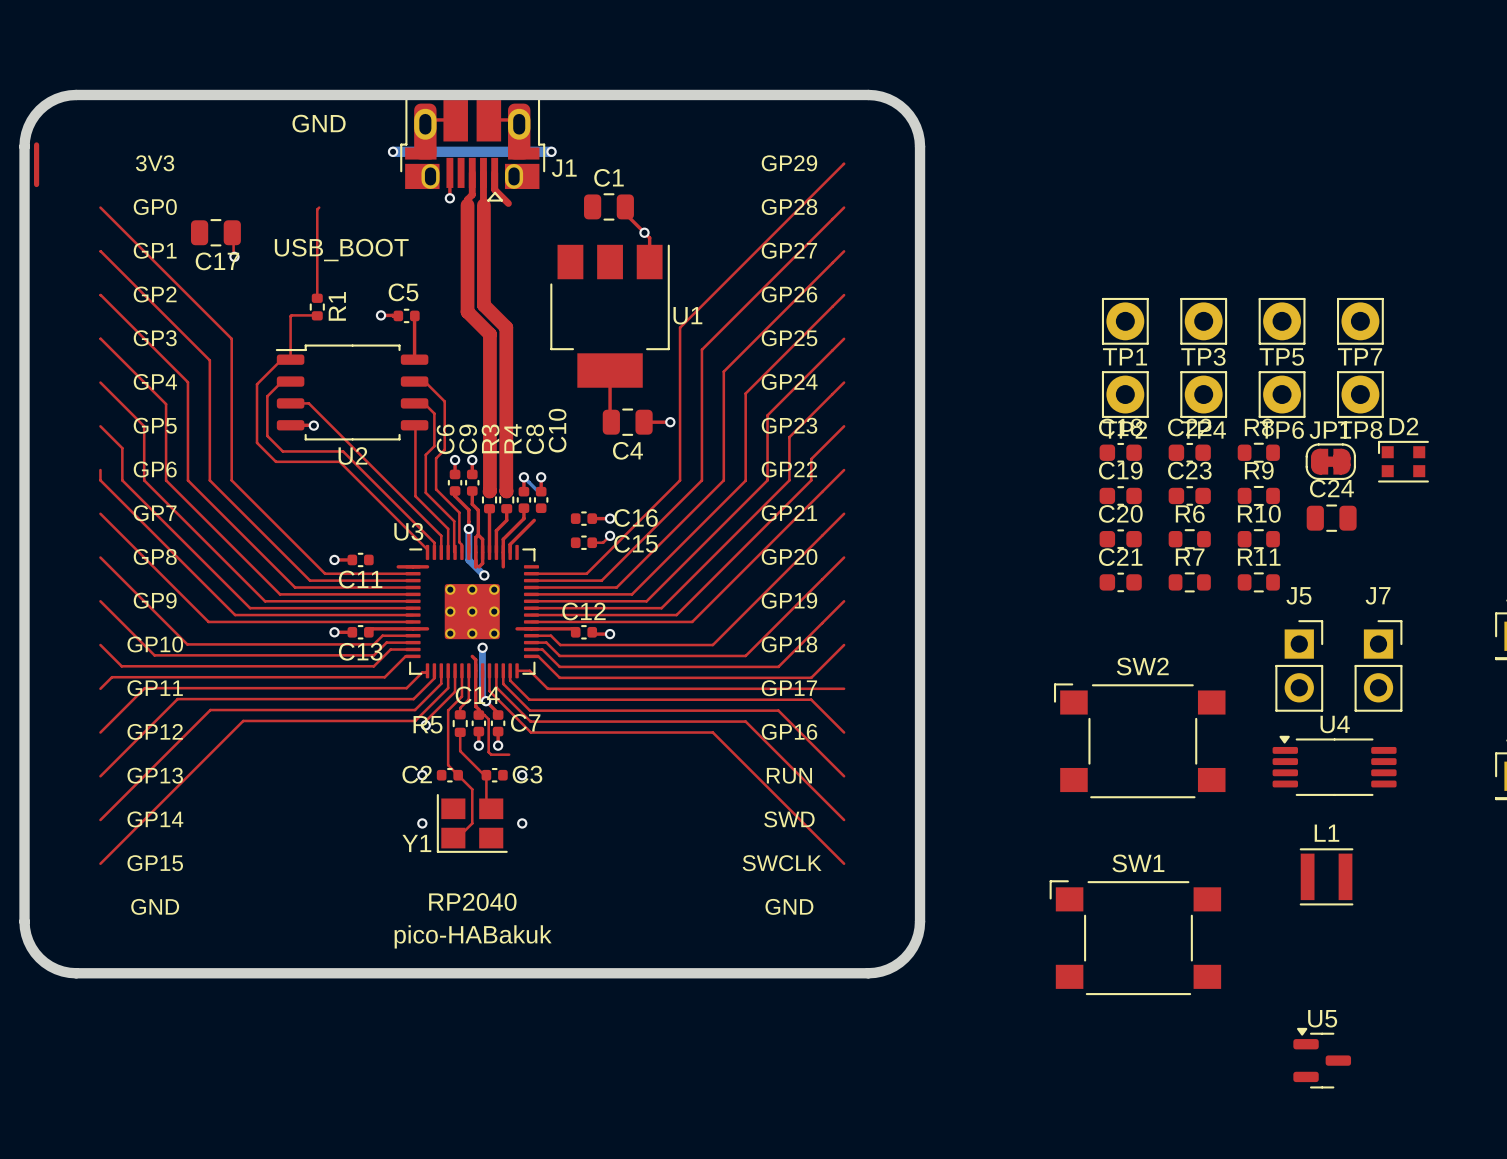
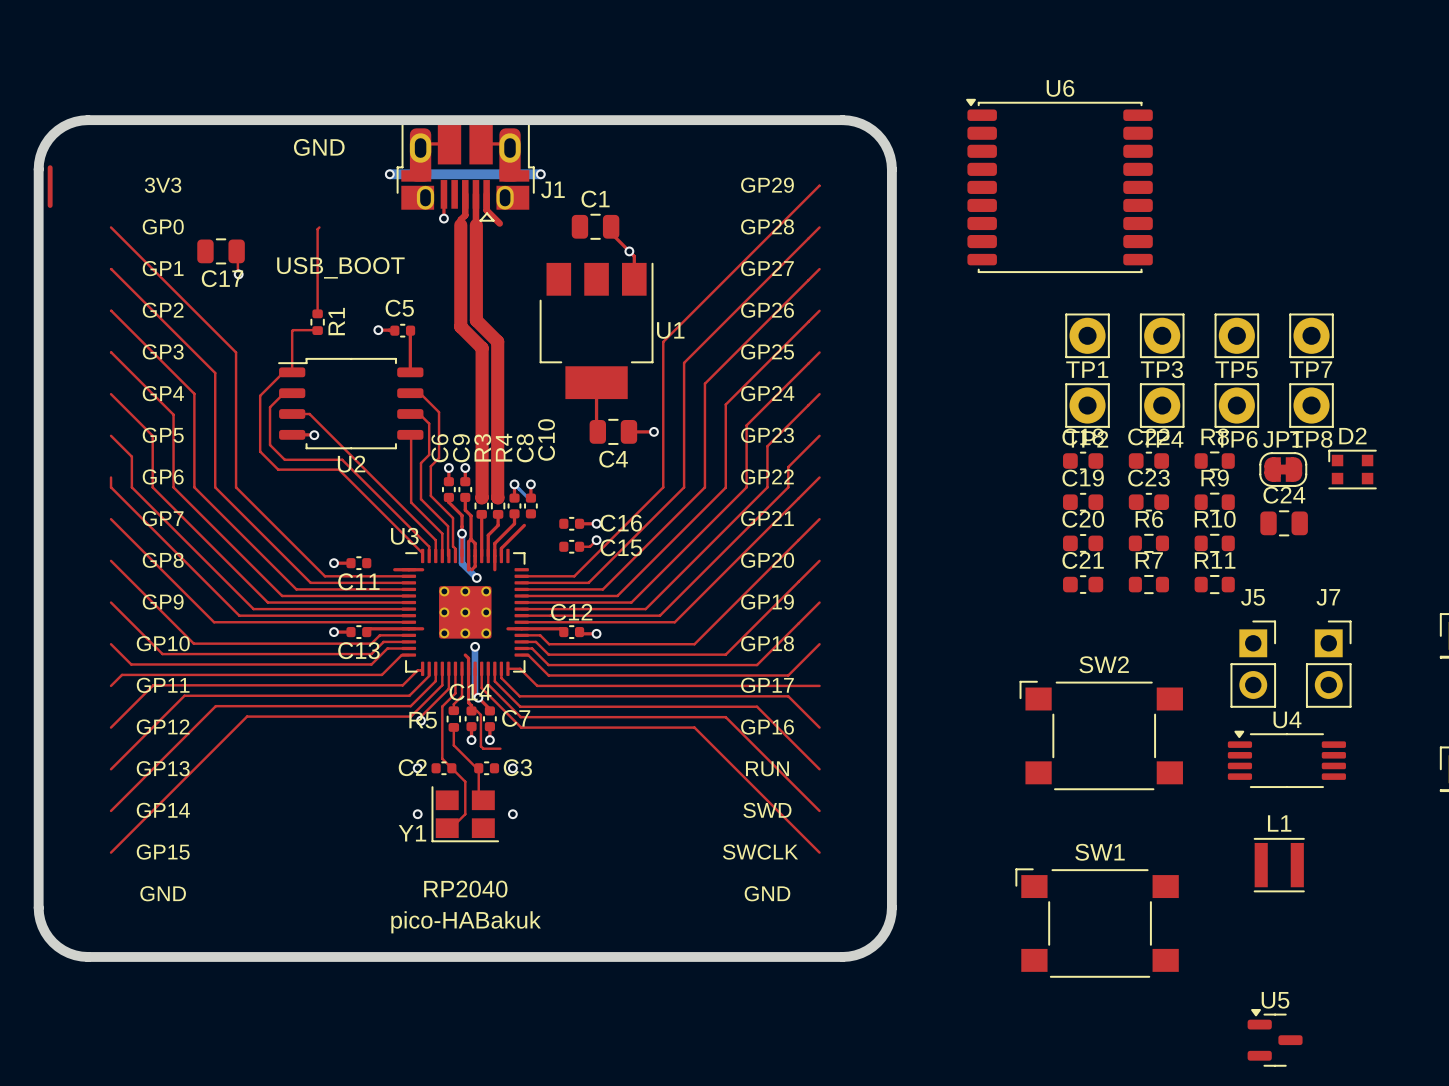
U6: none -> (1059, 185)

